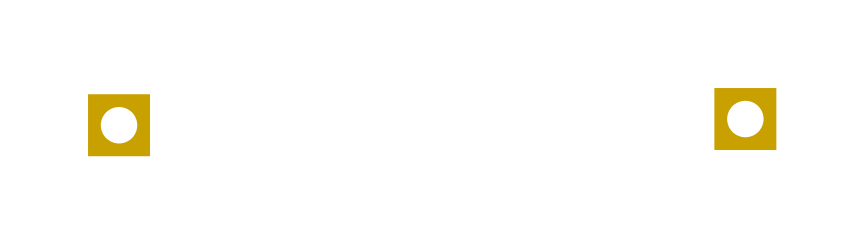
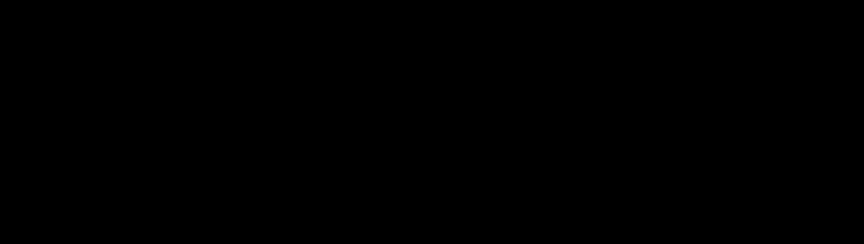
part: (745, 119) -> none
part: (119, 125) -> none

